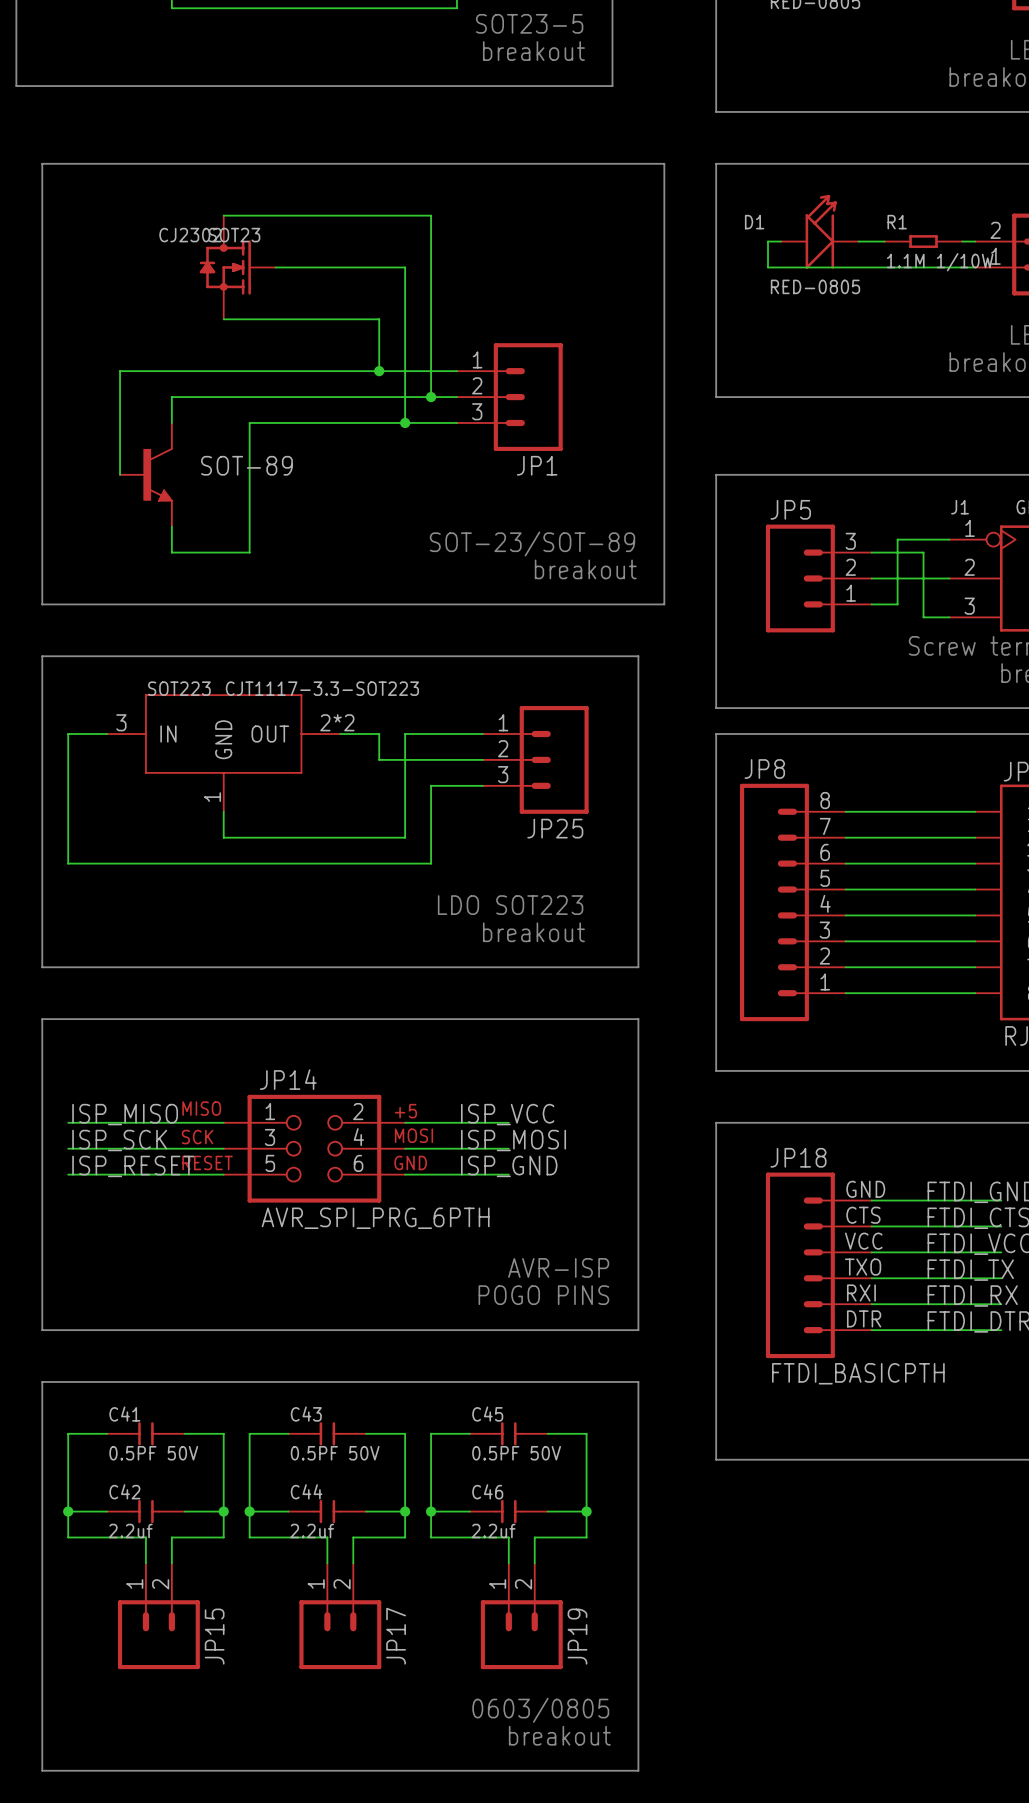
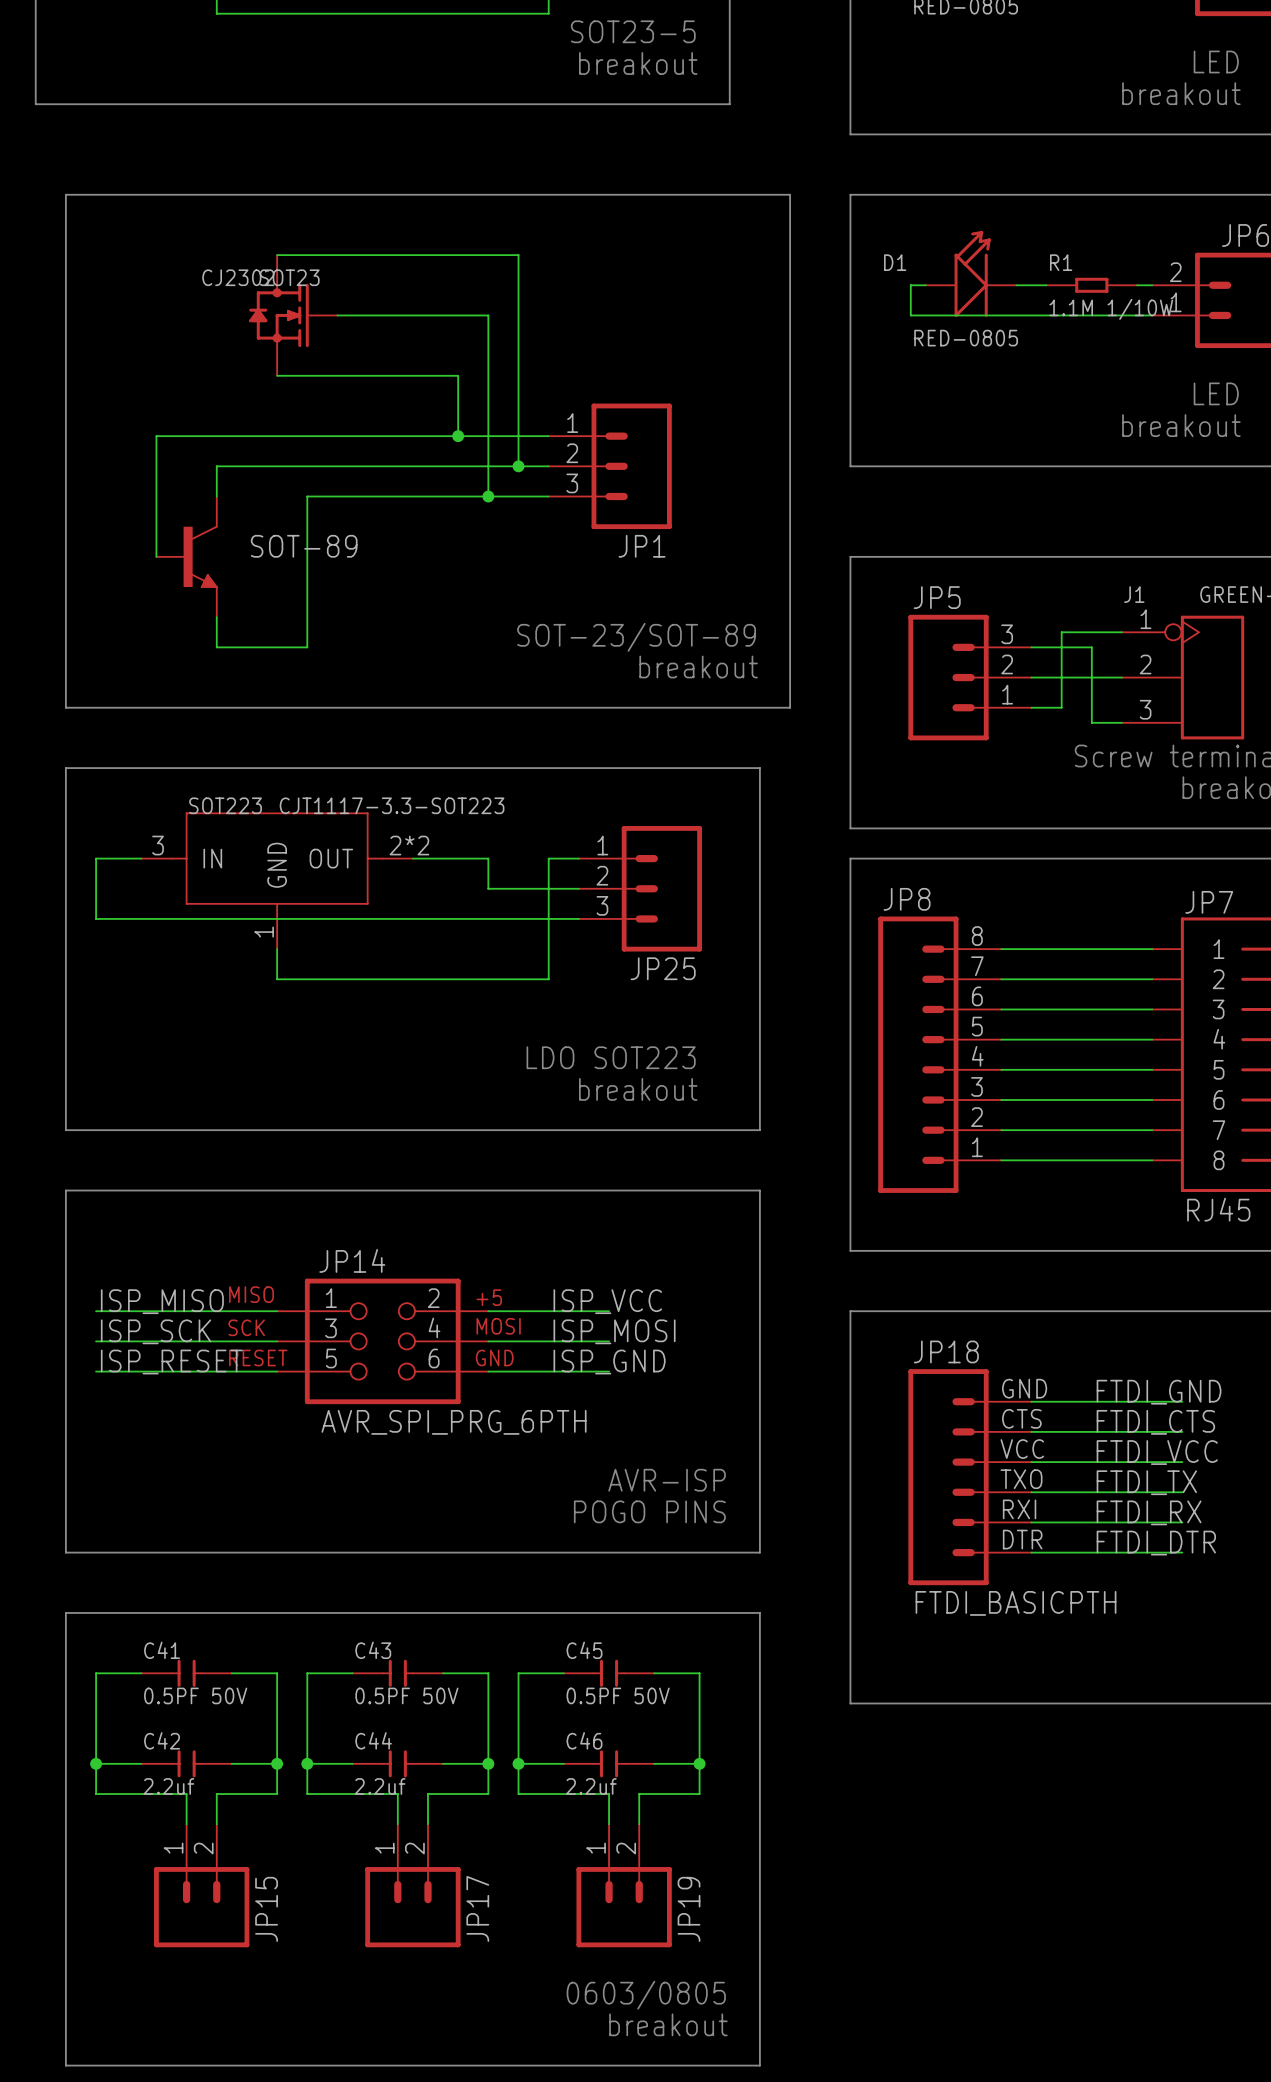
wire: (379, 734) (379, 759) (405, 759) (405, 837) -> (548, 858) (548, 979) (488, 979)
wire: (405, 734) (456, 734) -> (488, 858) (458, 858)
wire: (68, 785) (68, 863) (431, 863) (431, 785) -> (96, 918) (518, 918)

